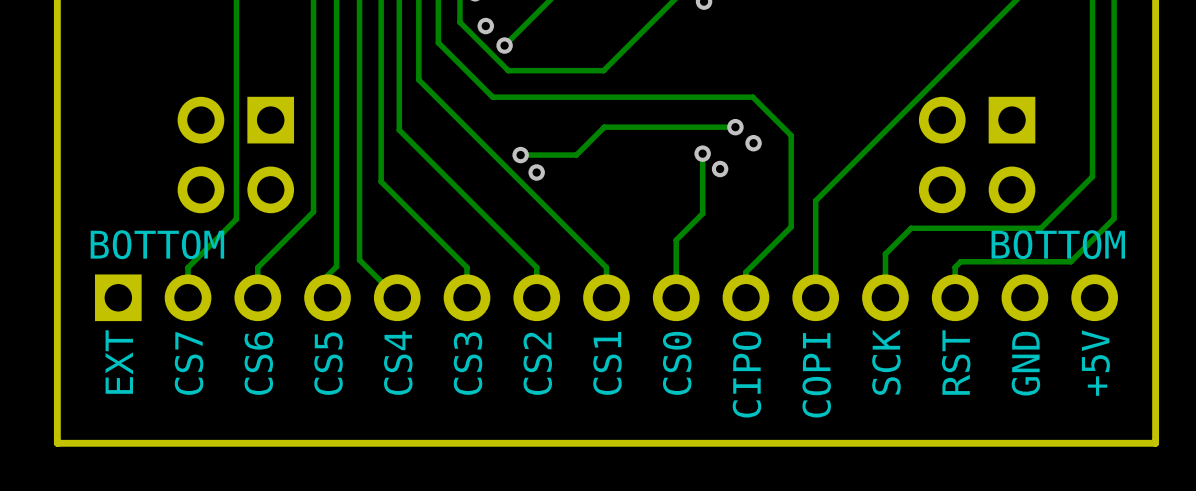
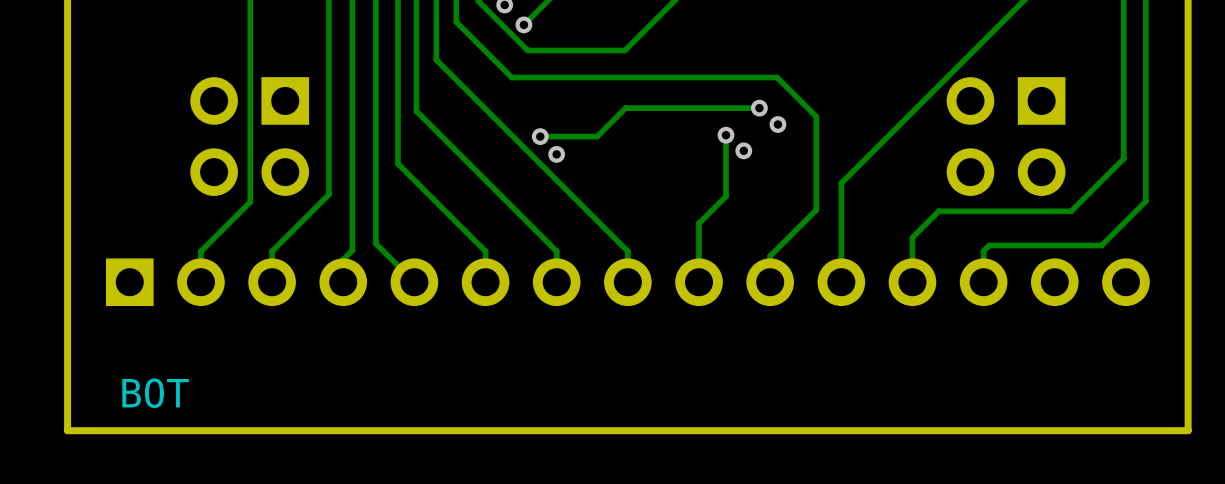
text: BOTTOM (157, 244) -> none
text: BOTTOM (1058, 244) -> none
text: EXT (119, 362) -> none
text: SCK (886, 362) -> none
text: RST (956, 362) -> none
text: CS7 (189, 363) -> none
text: CS6 (258, 363) -> none
text: CS5 (328, 363) -> none
text: CS4 (398, 363) -> none
text: CS3 (468, 363) -> none
text: CS2 (537, 363) -> none
text: CS1 (607, 363) -> none
text: CS0 (677, 363) -> none
text: GND (1025, 363) -> none
text: +5V (1095, 363) -> none
text: CIPO (746, 374) -> none
text: COPI (816, 375) -> none
text: none -> BOT (155, 393)

